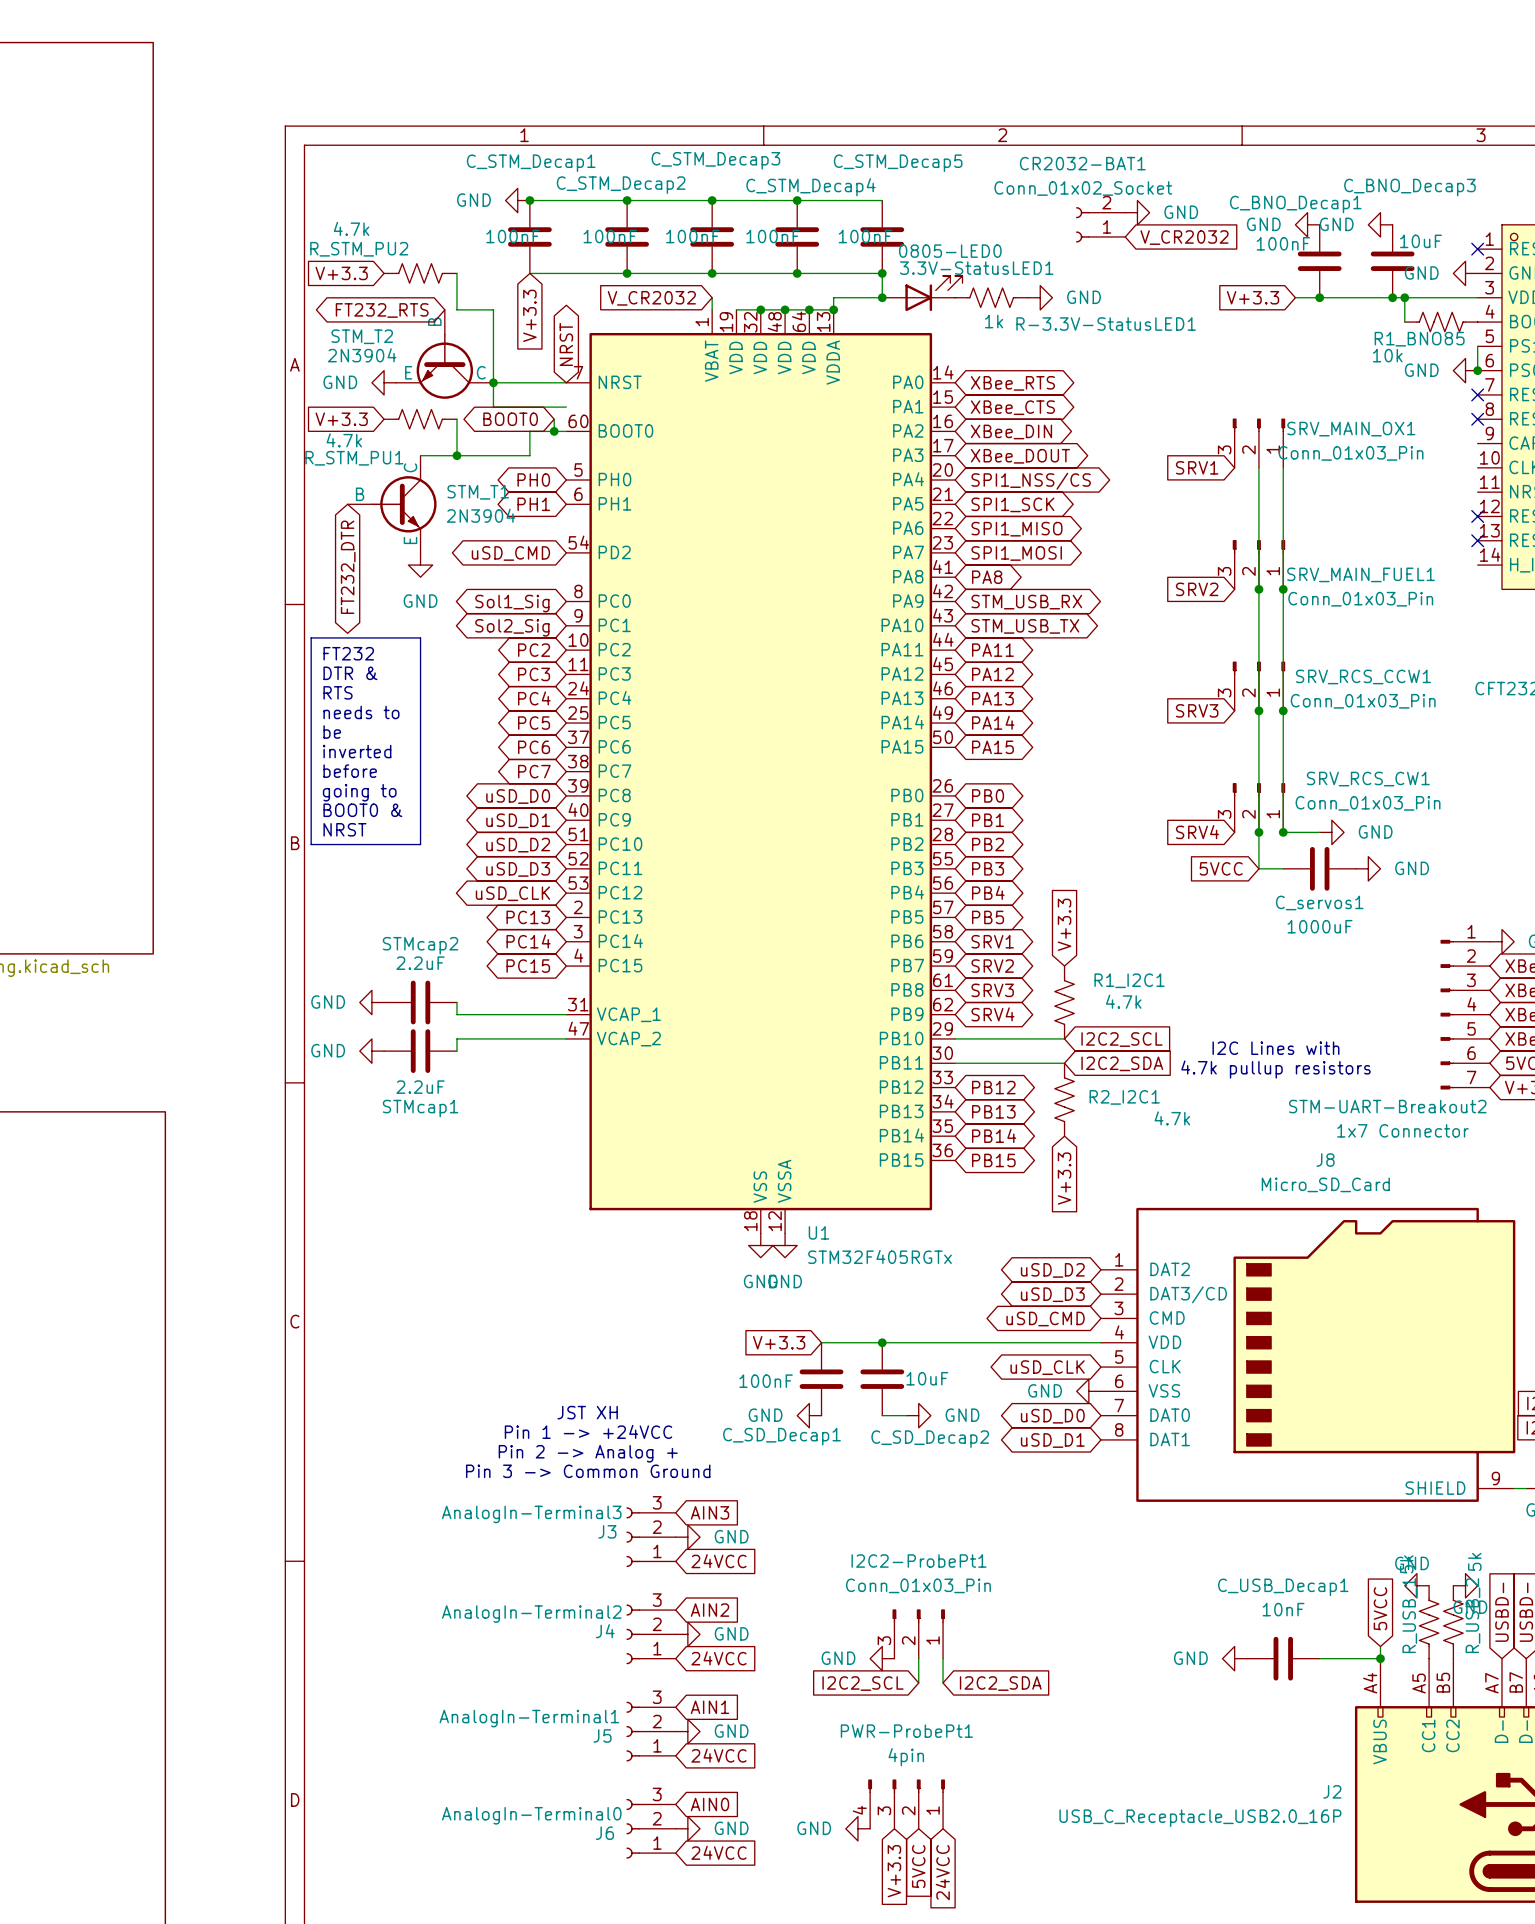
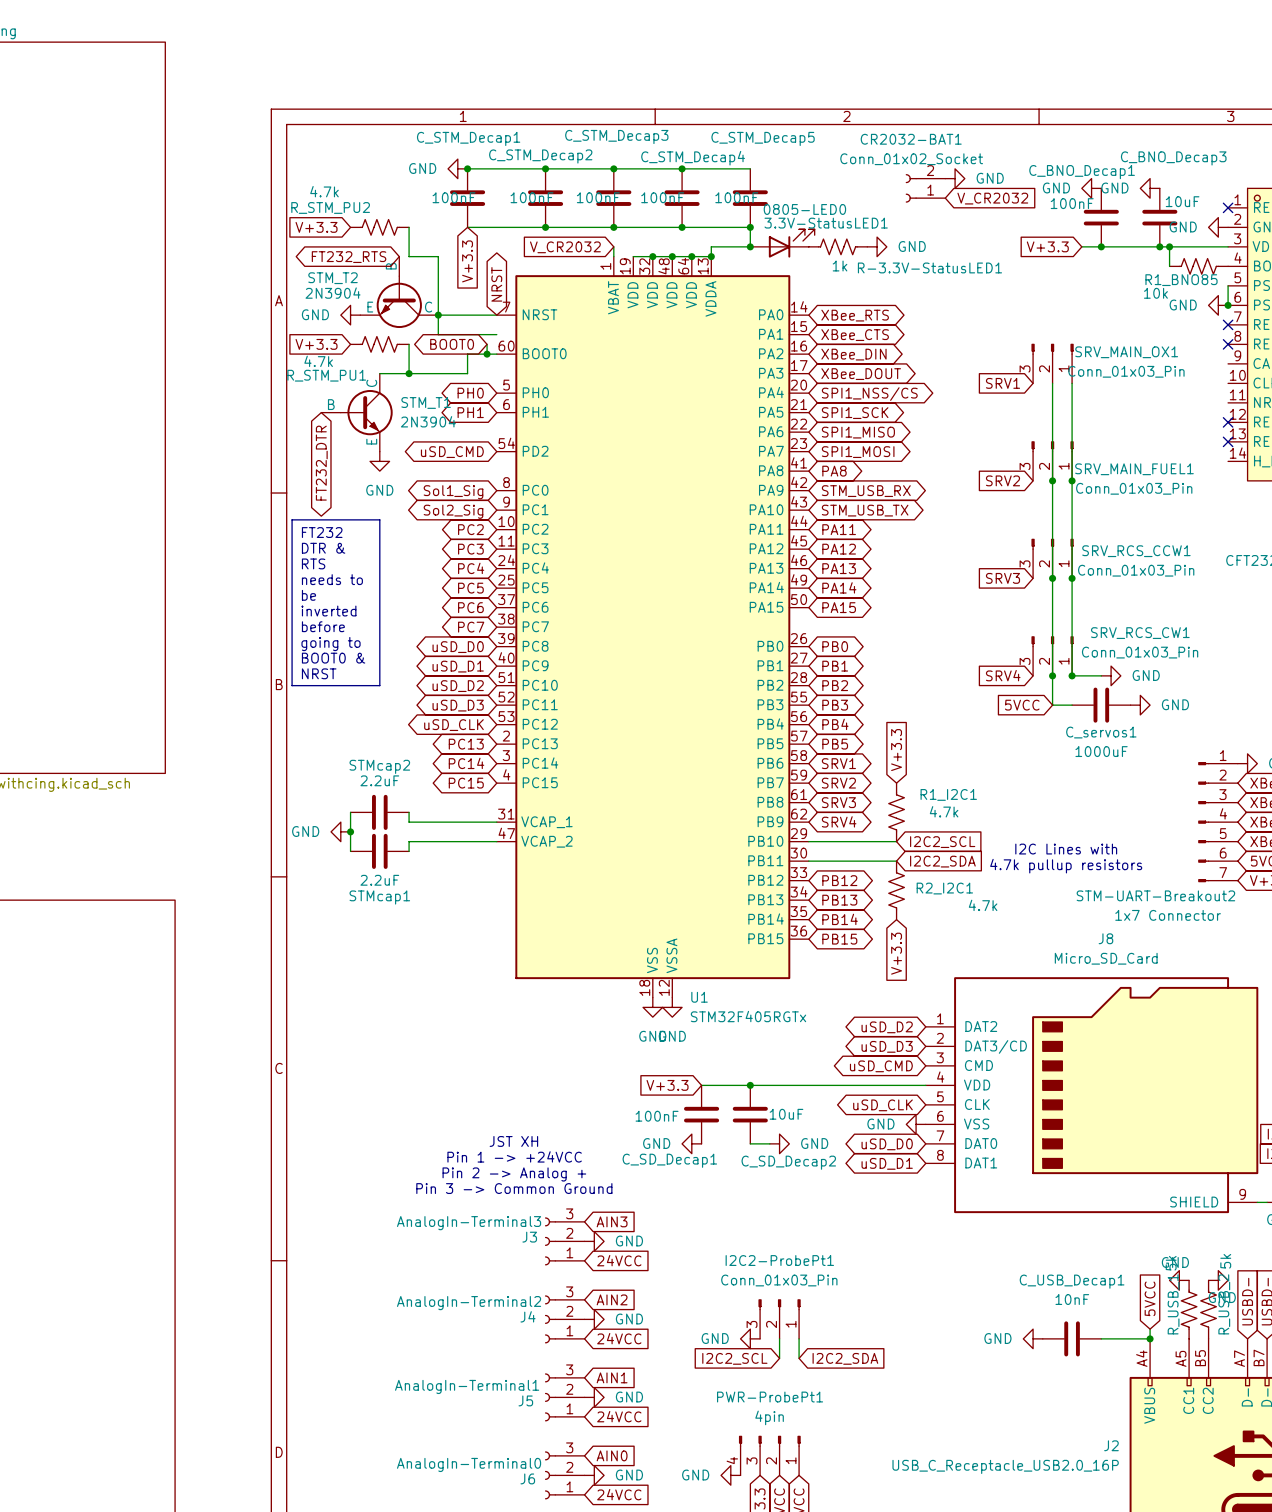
power symbol: GND (371, 1002) -> none
wire: none -> (350, 812) (350, 851)
power symbol: none -> GND (340, 831)
junction: none -> (350, 831)
power symbol: GND (371, 1051) -> none

